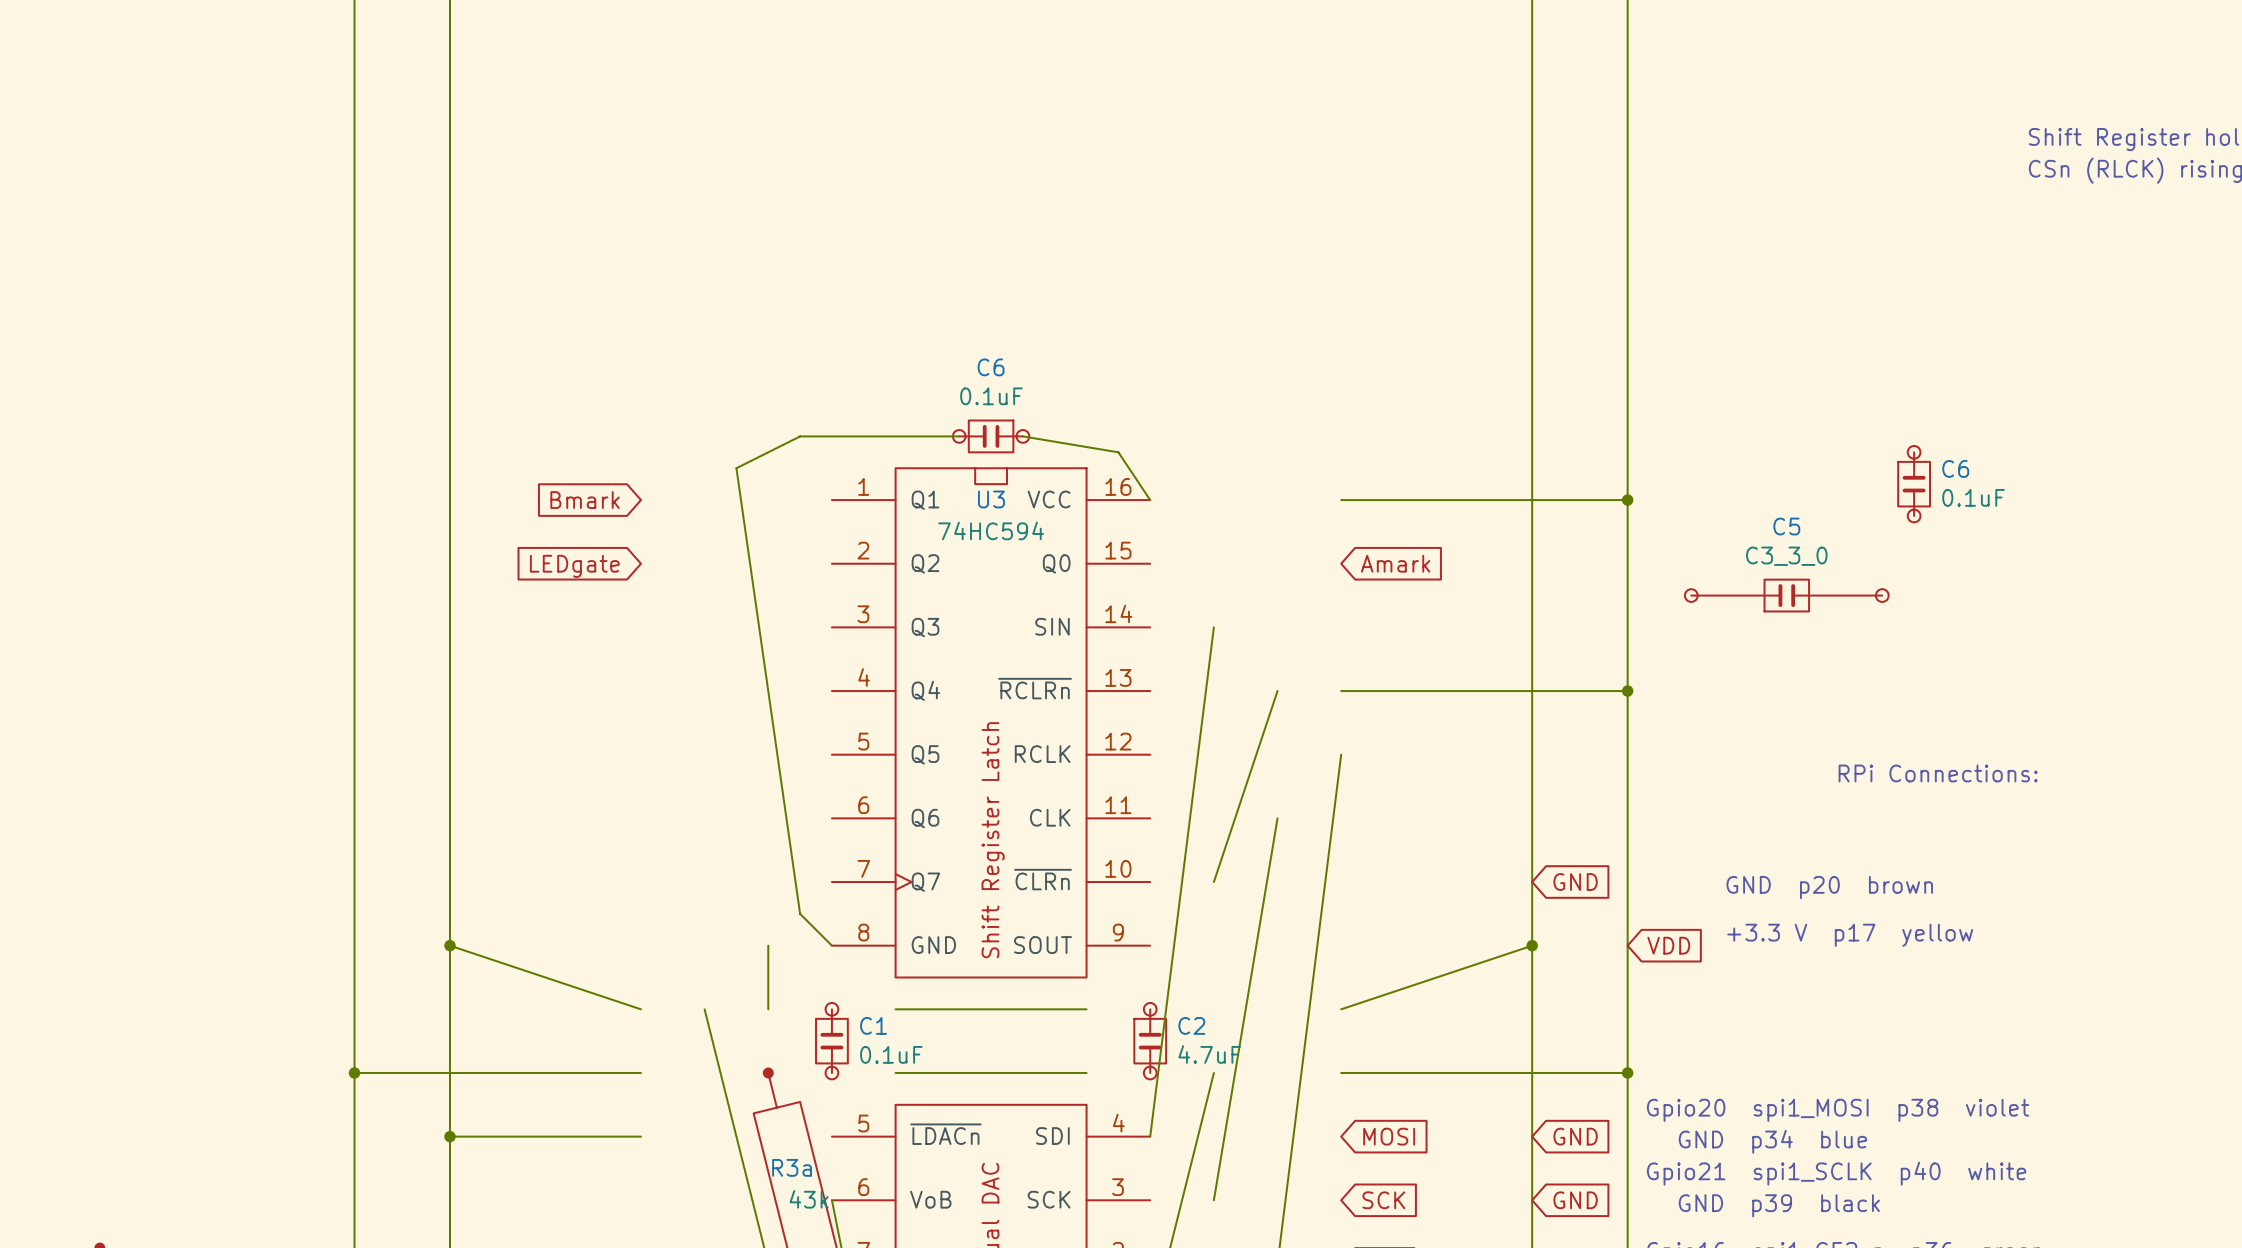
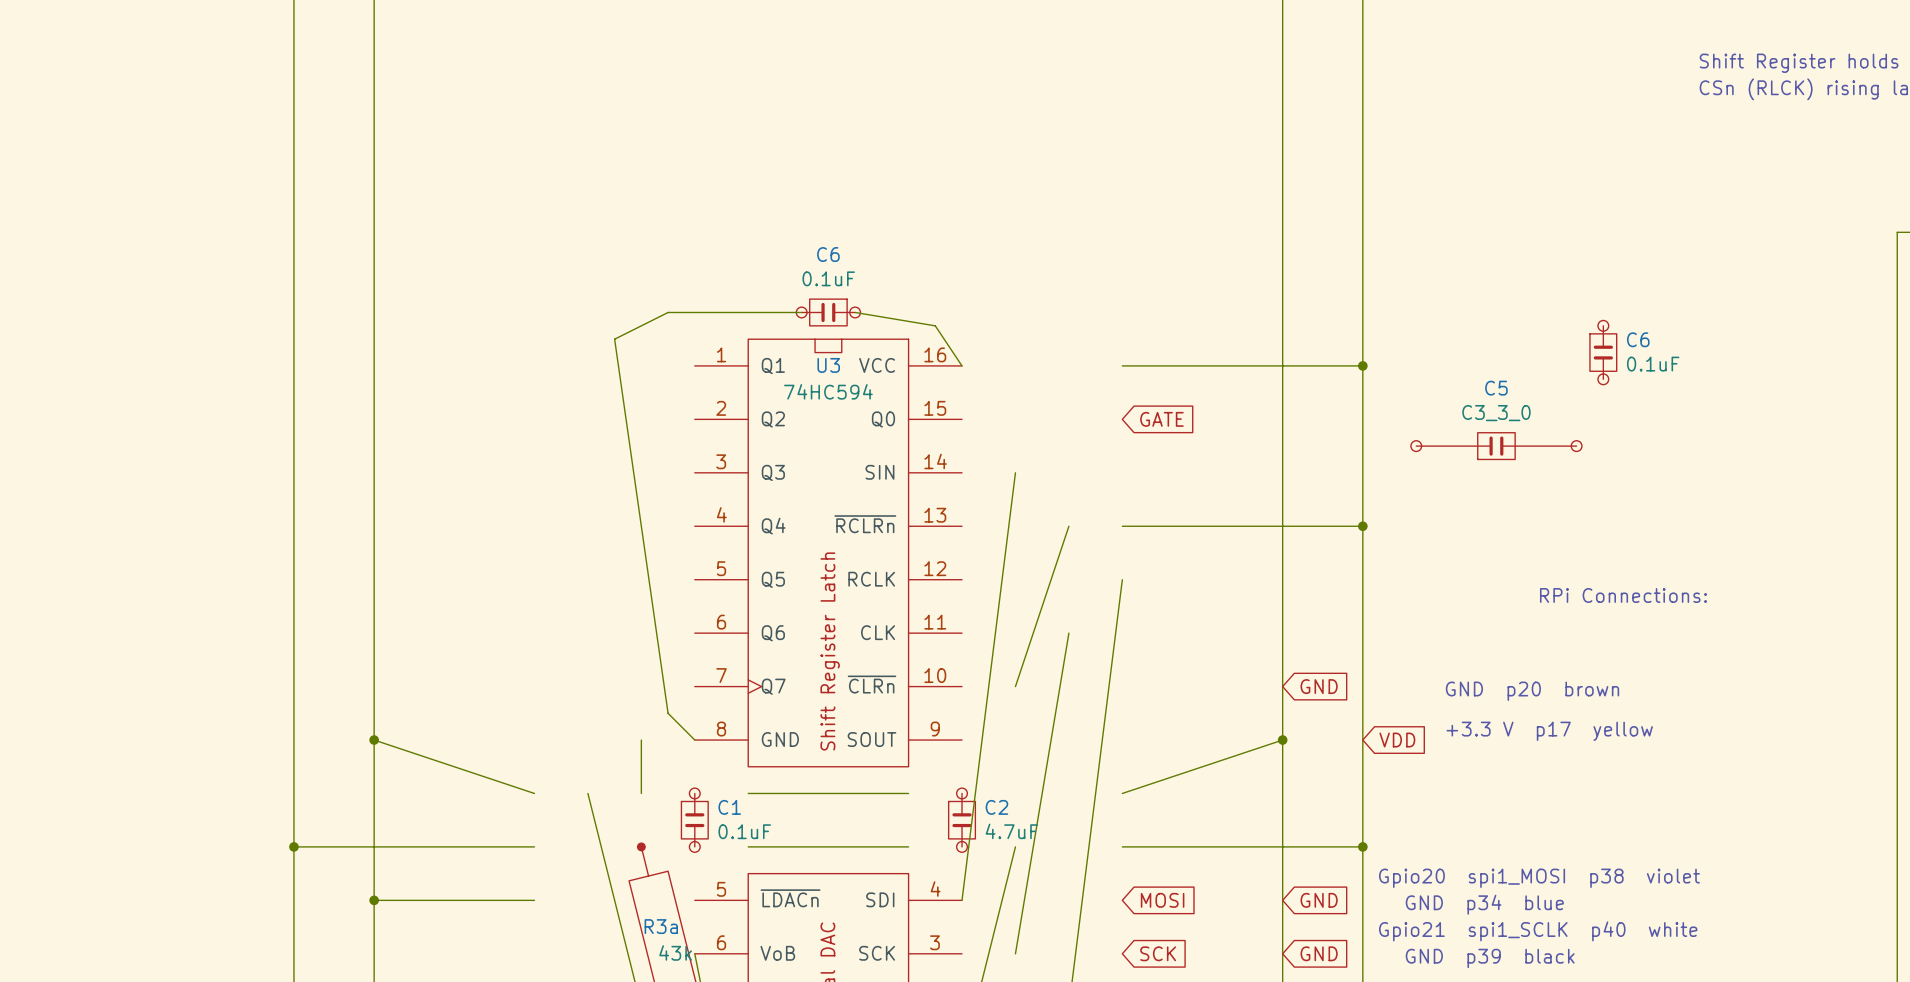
global label: Bmark (585, 500) -> none
global label: Amark (1395, 563) -> GATE (1161, 419)
global label: LEDgate (574, 566) -> none

